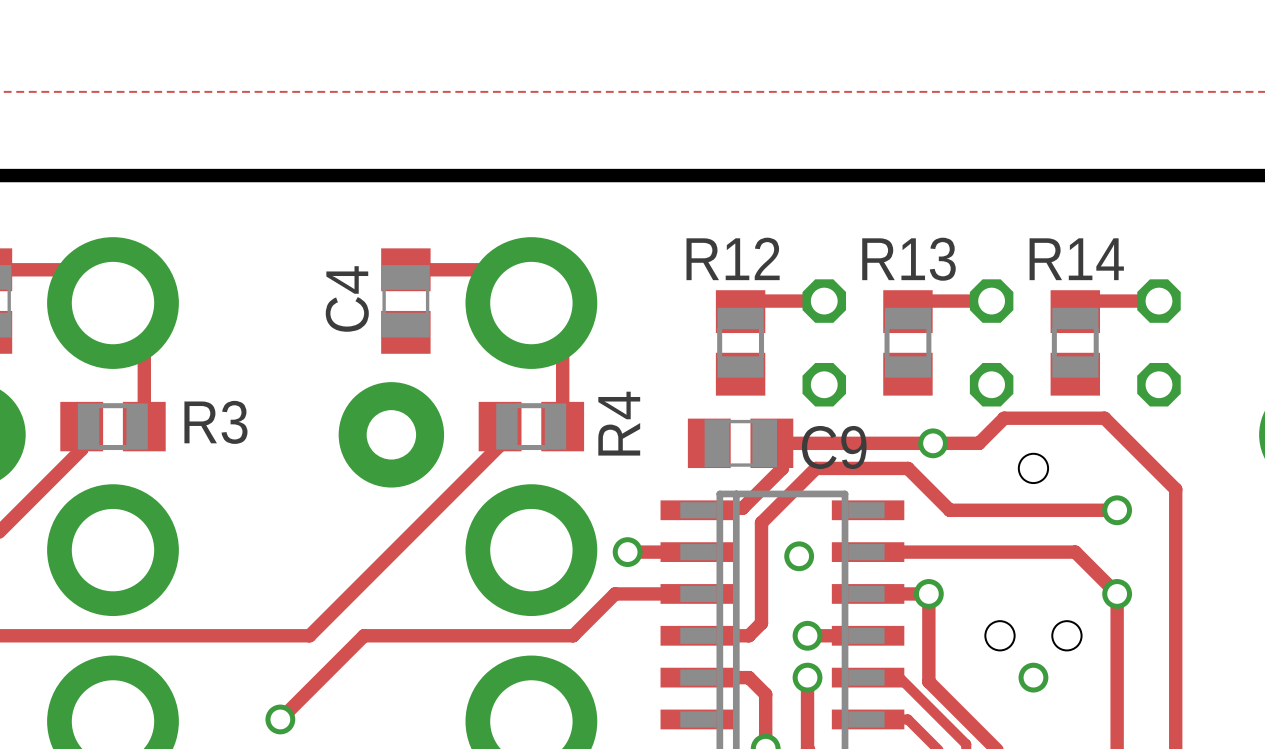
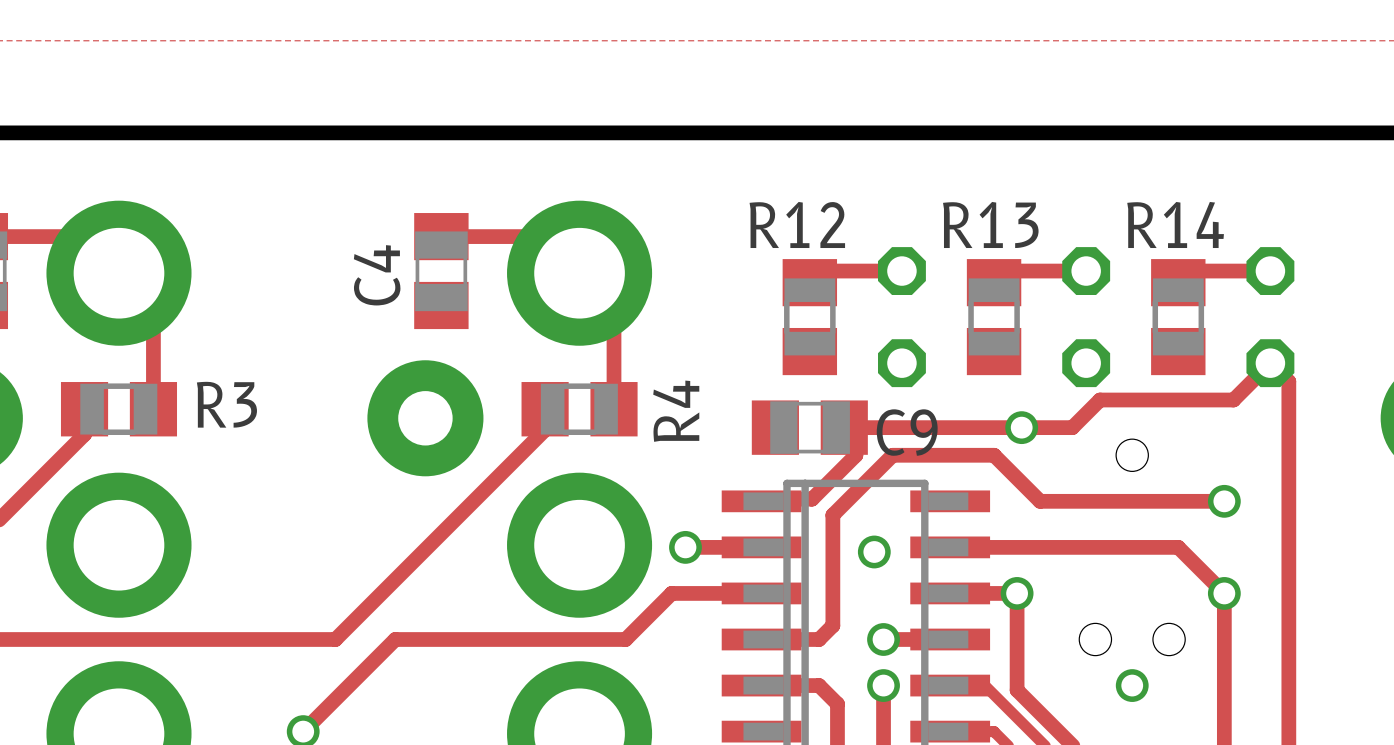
track: (1104, 418) (1175, 489) -> (1210, 400) (1233, 400) (1270, 363) (1288, 381) (1288, 478)

